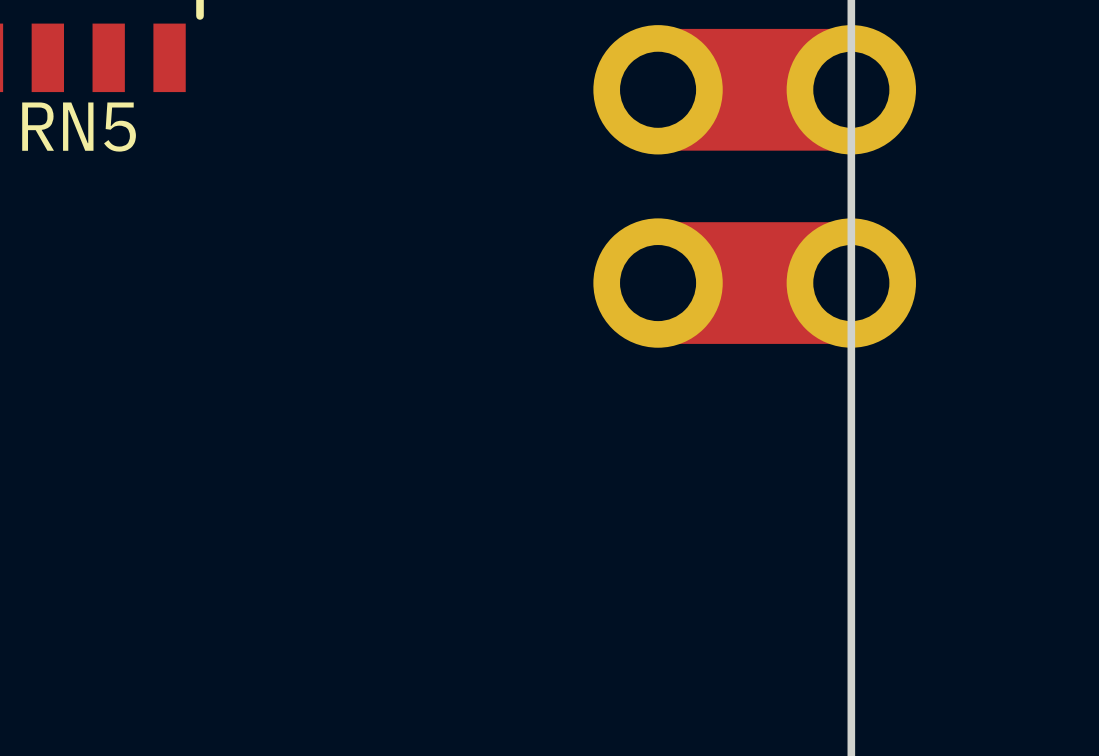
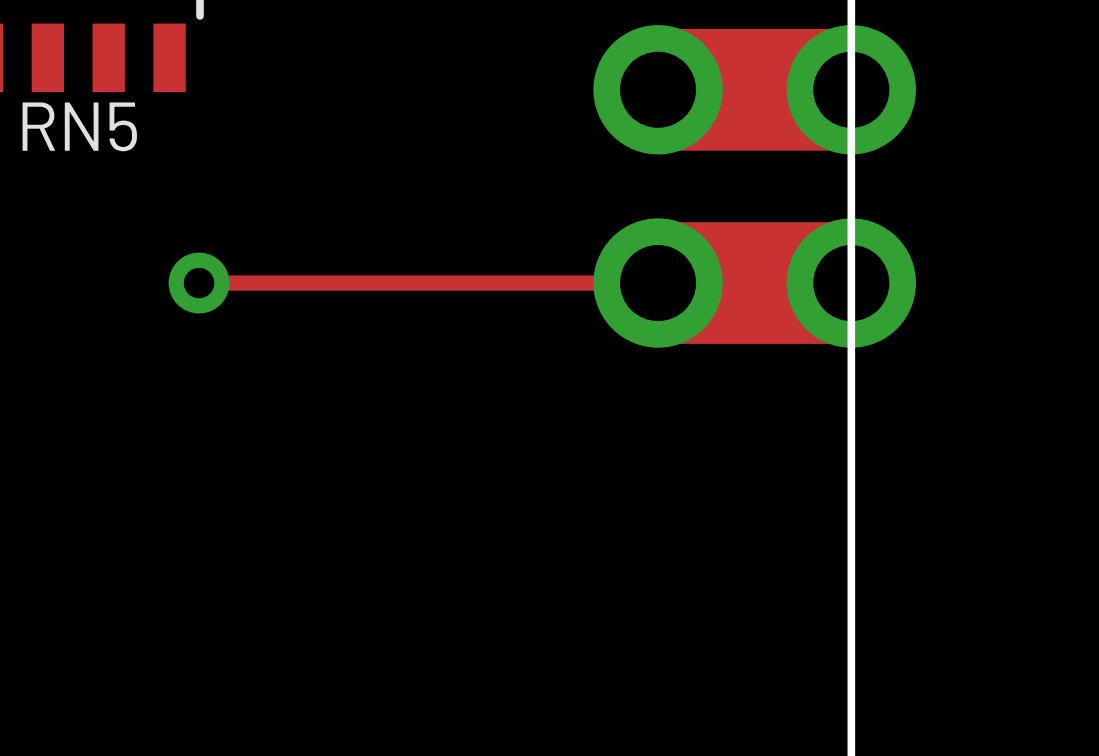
track: none -> (199, 283) (658, 283)
via: none -> (199, 283)

